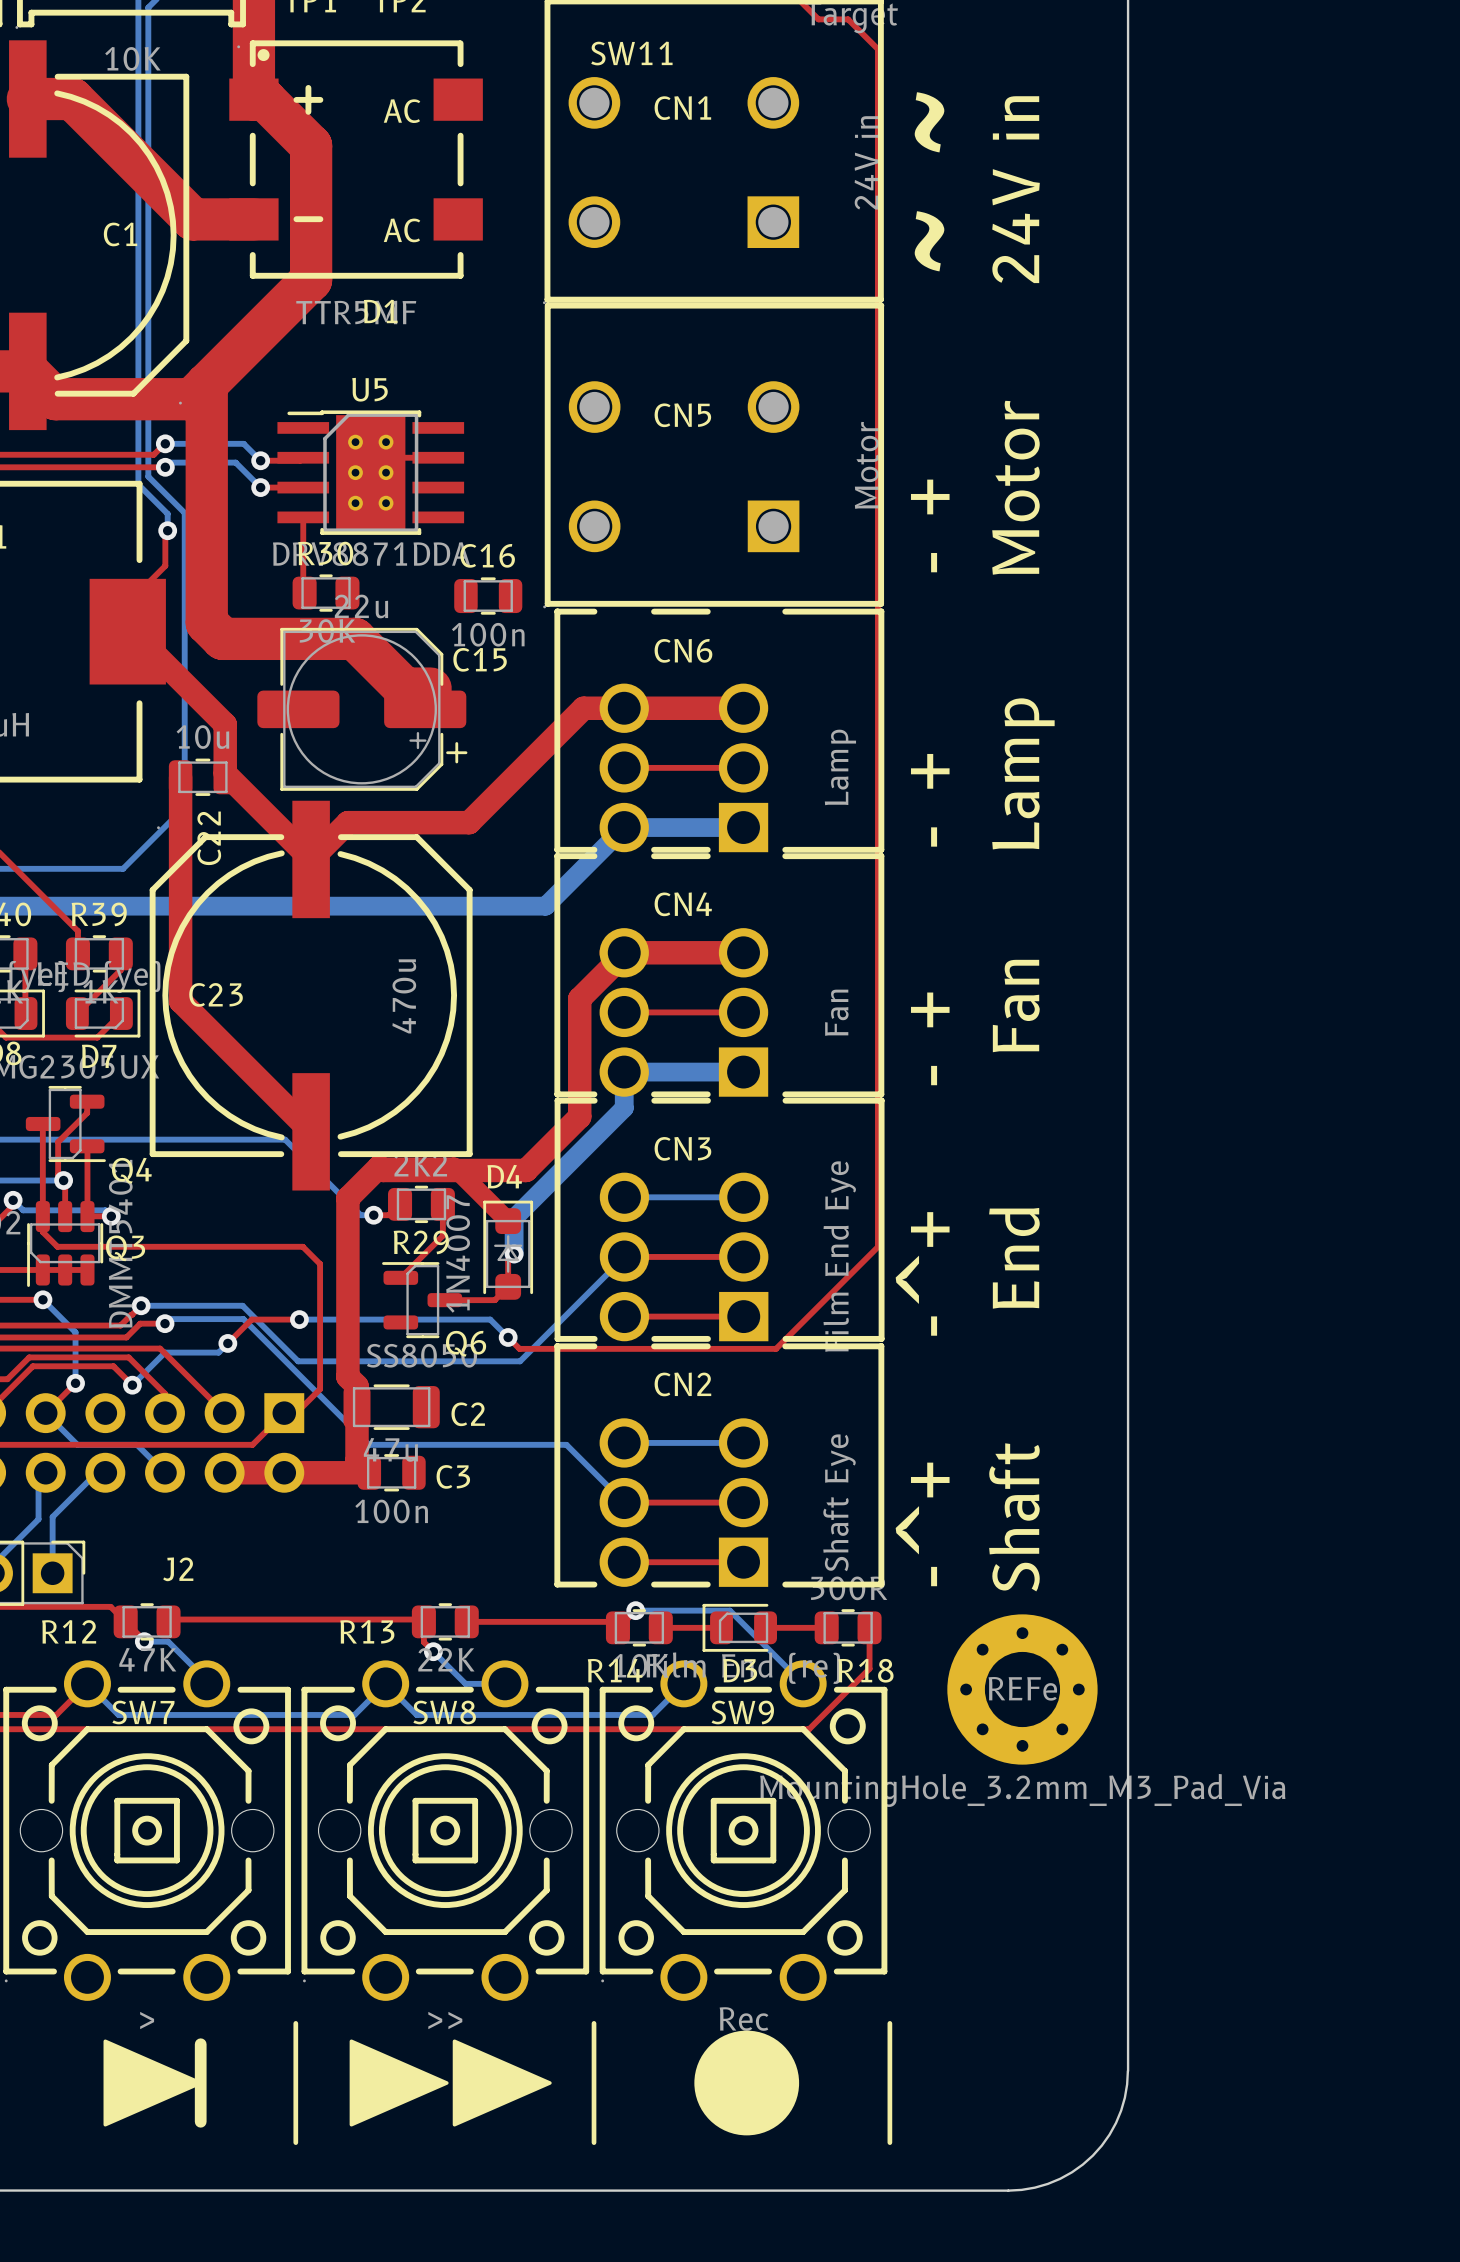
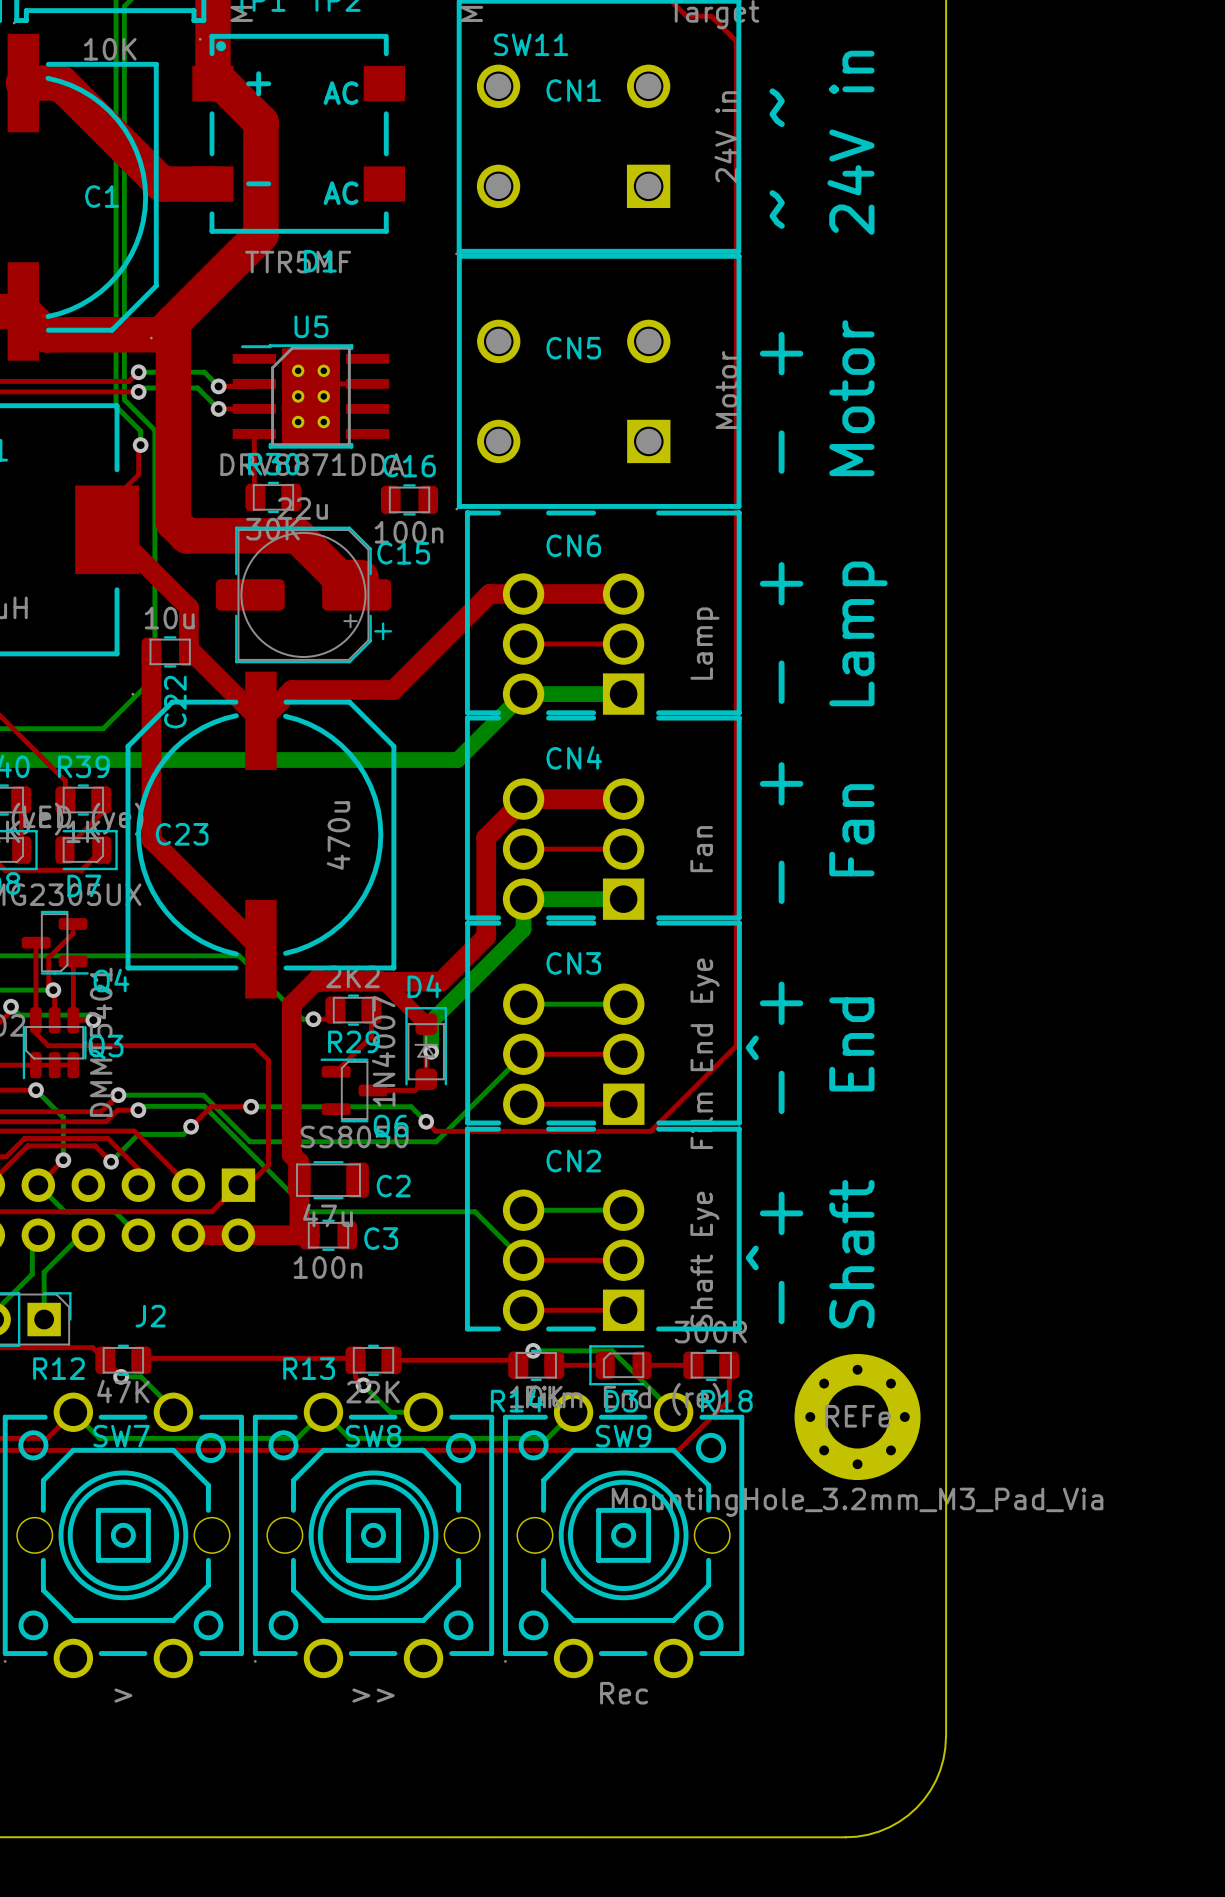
line: (295, 2023) (295, 2142) -> none
line: (594, 2023) (594, 2142) -> none
line: (889, 2023) (889, 2142) -> none
drawing: [694, 2030, 800, 2136] -> none
drawing: [103, 2039, 203, 2127] -> none
drawing: [349, 2039, 552, 2127] -> none
line: (200, 2044) (200, 2121) -> none

